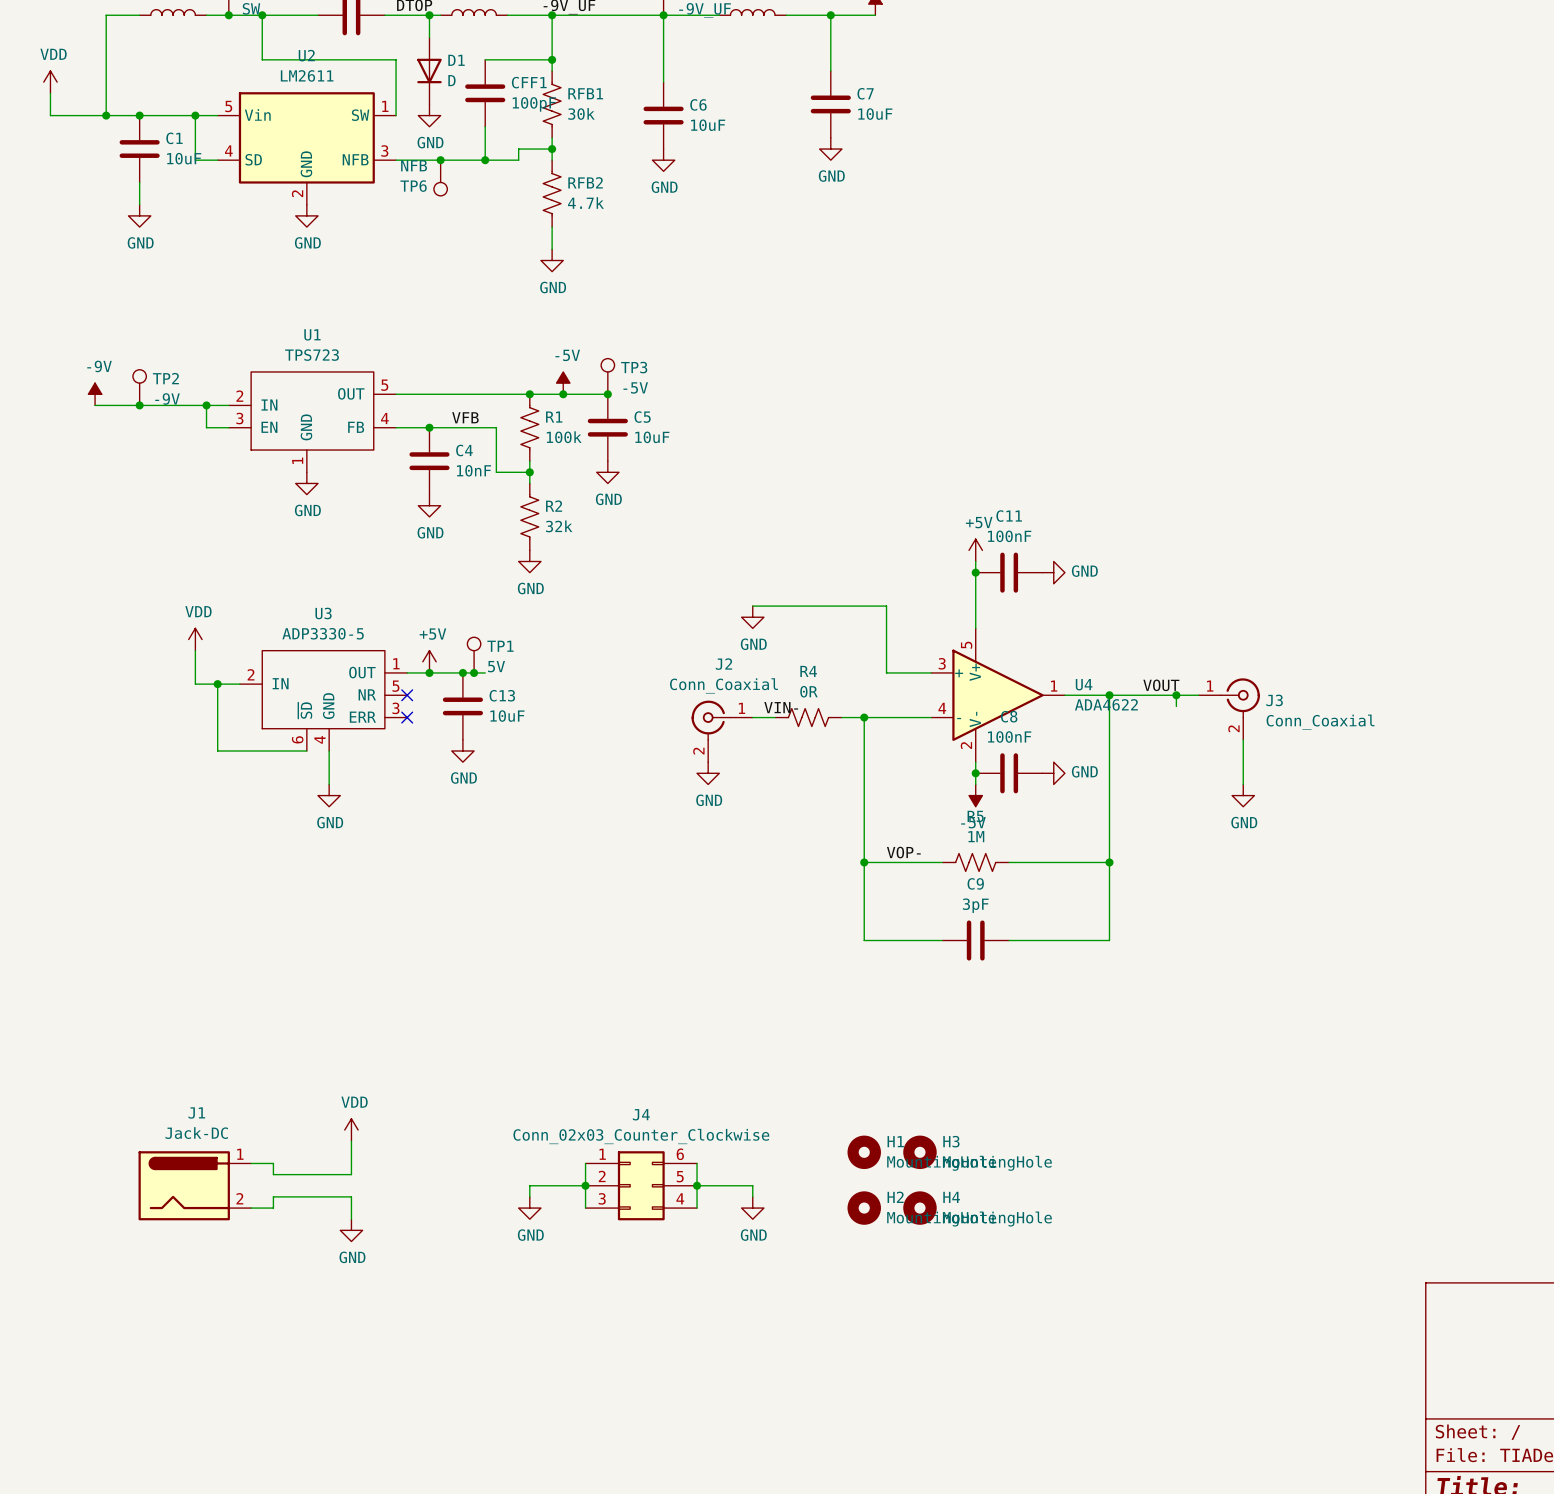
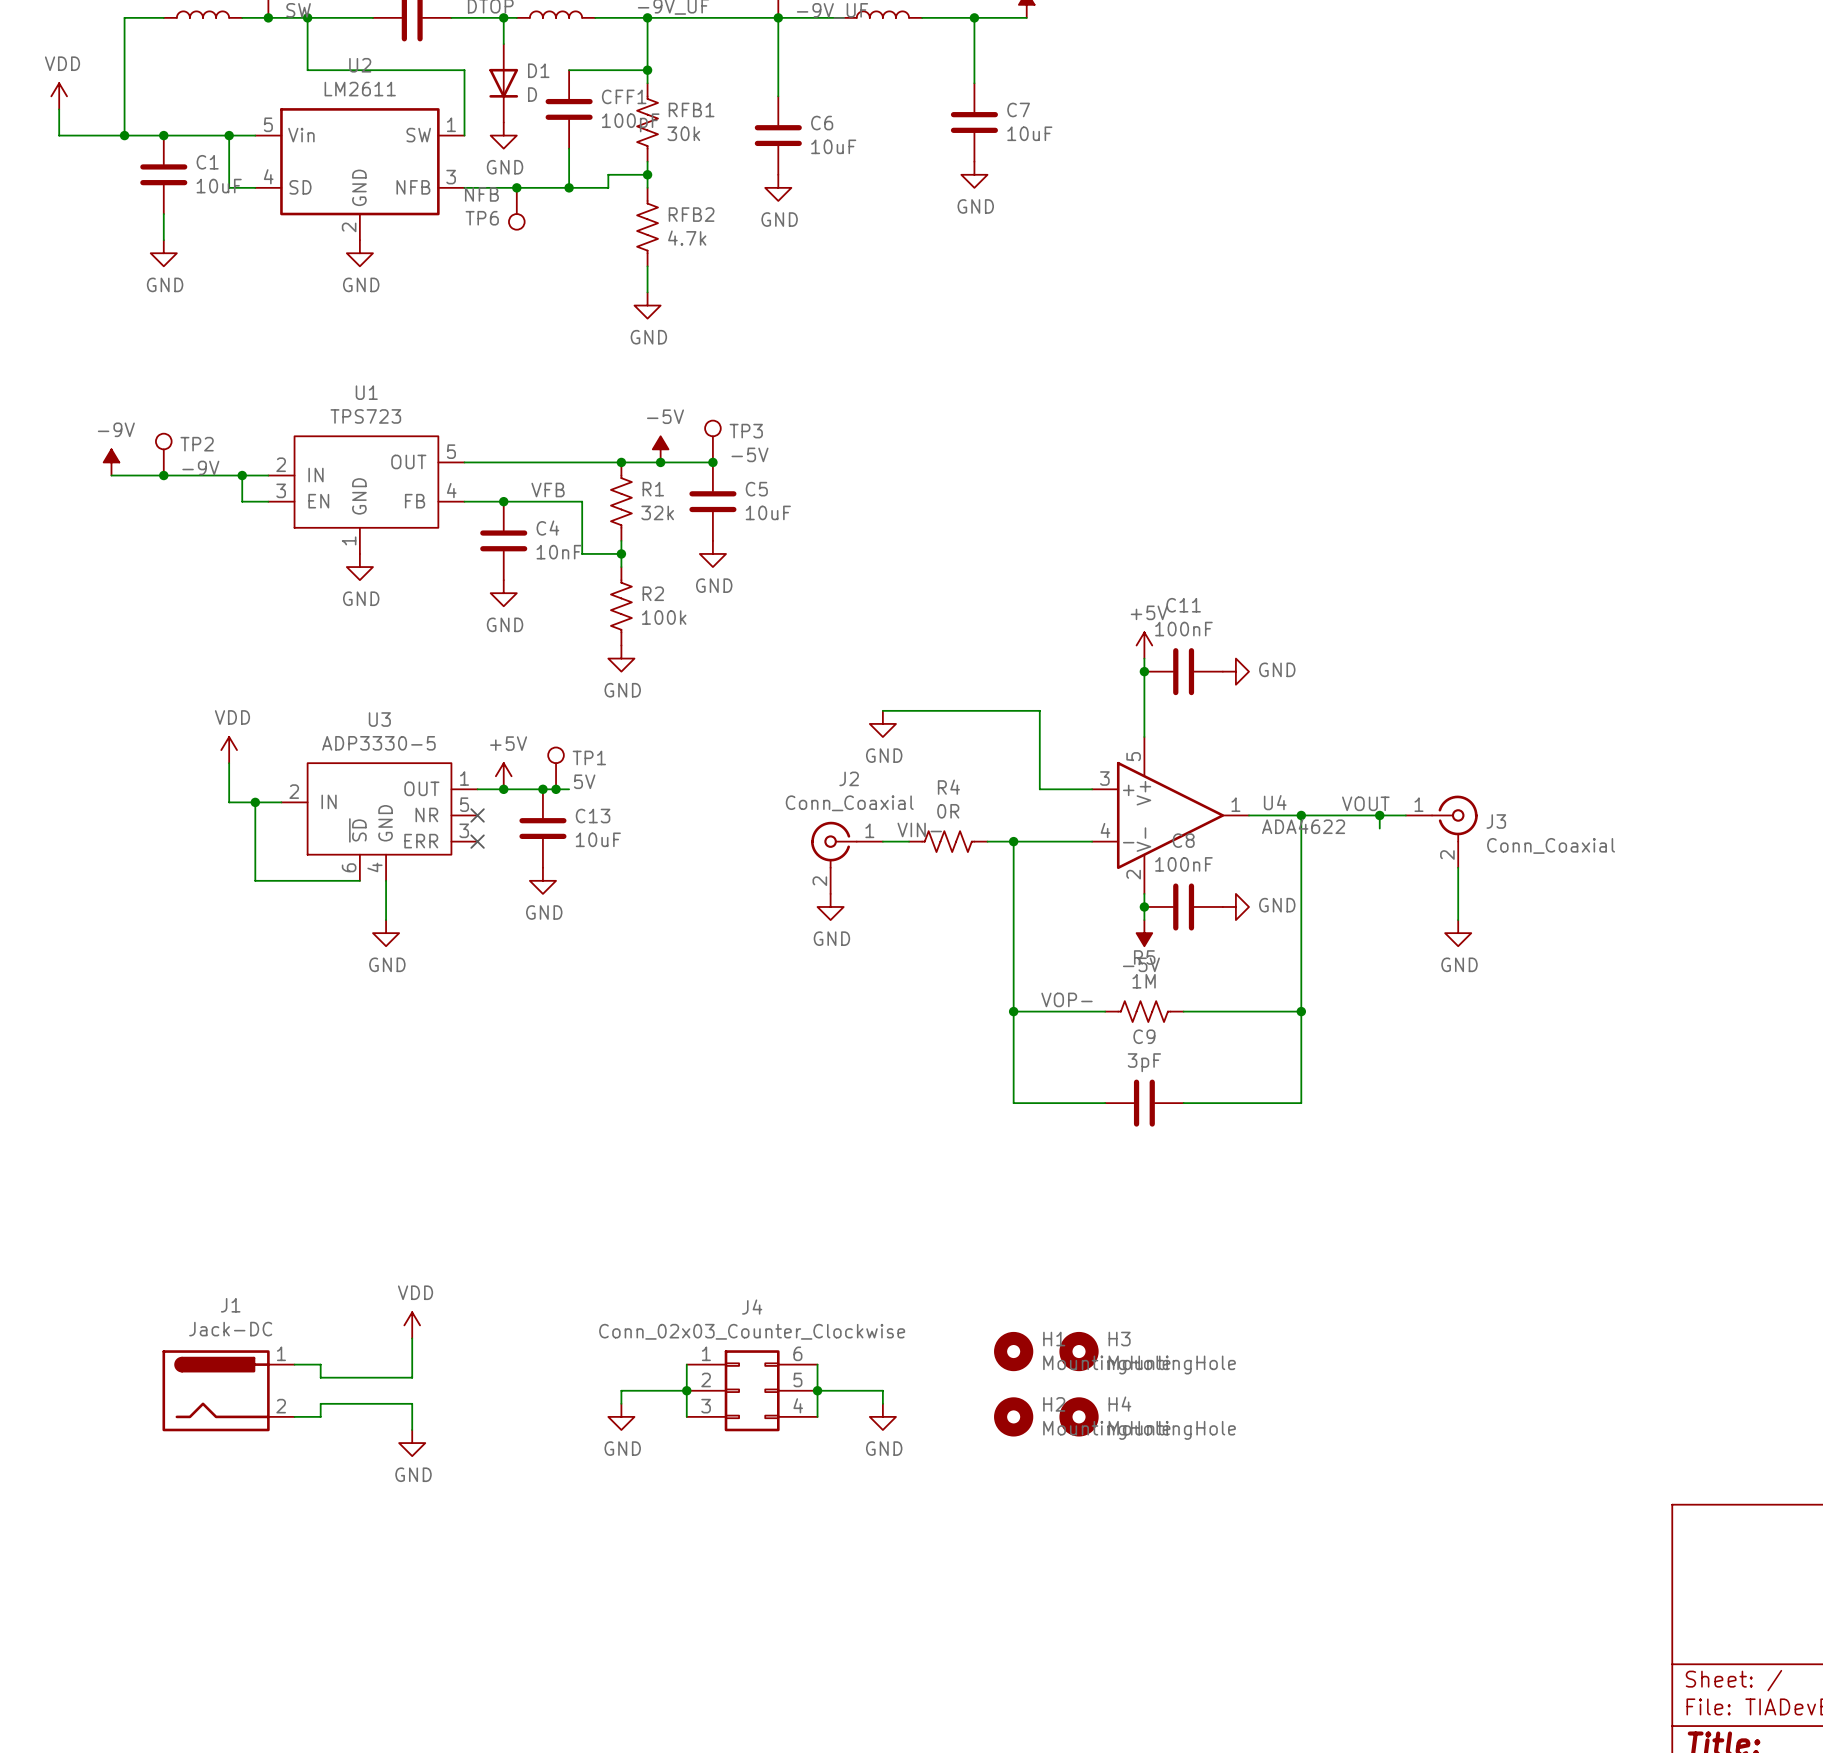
R1 value: 100k (564, 437) -> 32k (657, 512)
R2 value: 32k (559, 526) -> 100k (664, 617)

